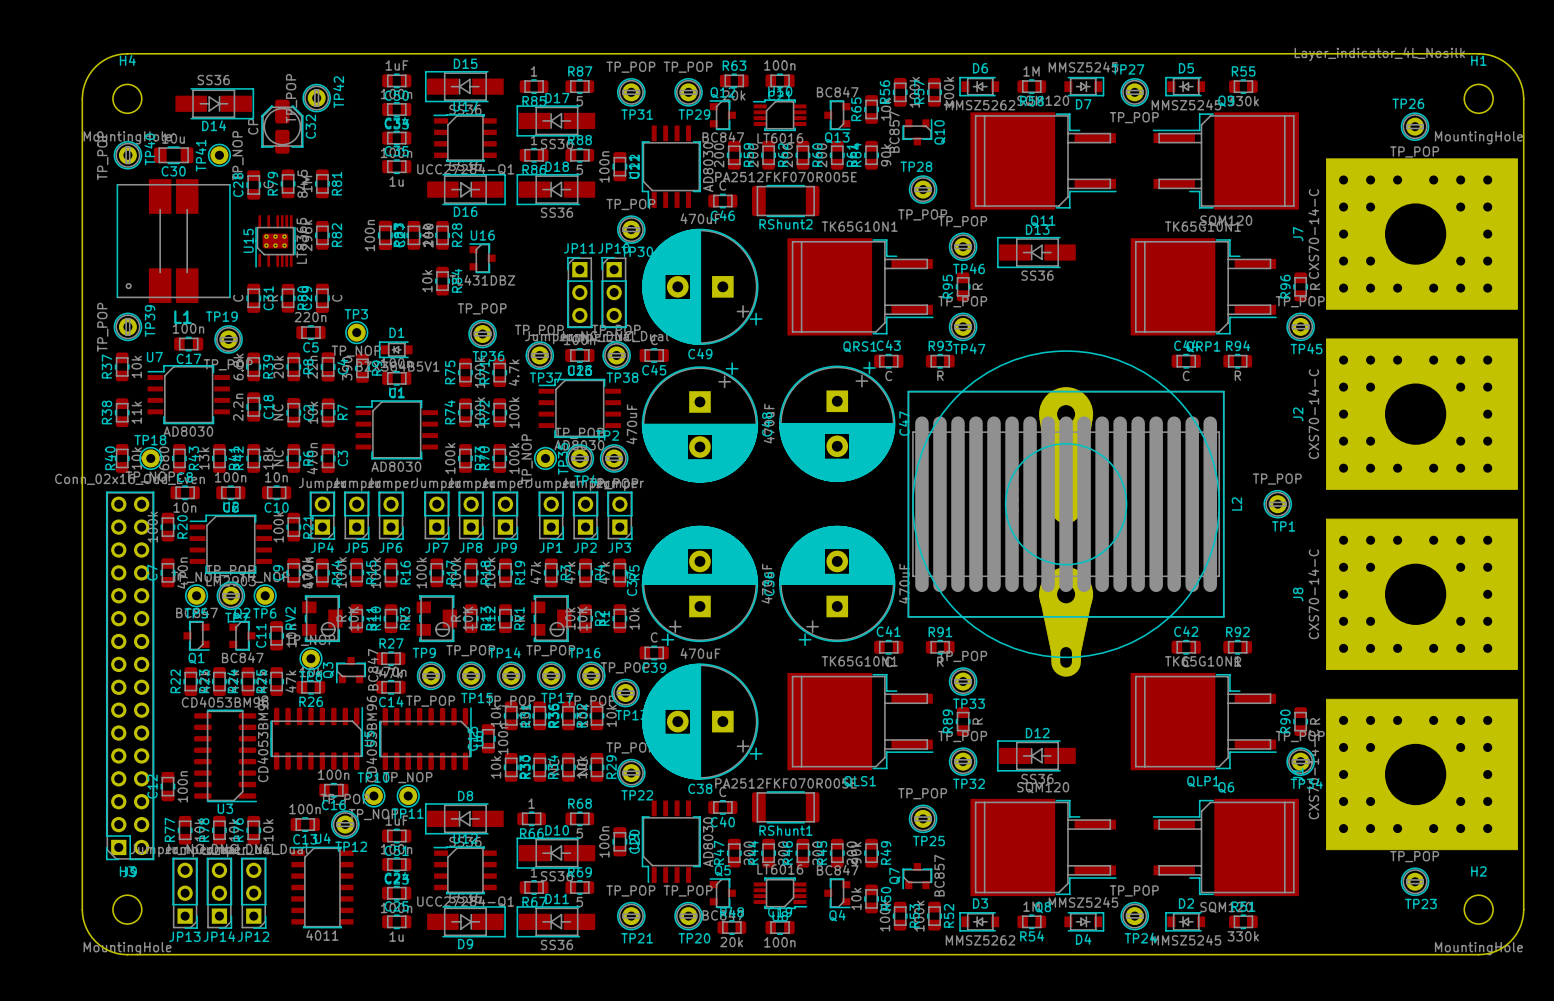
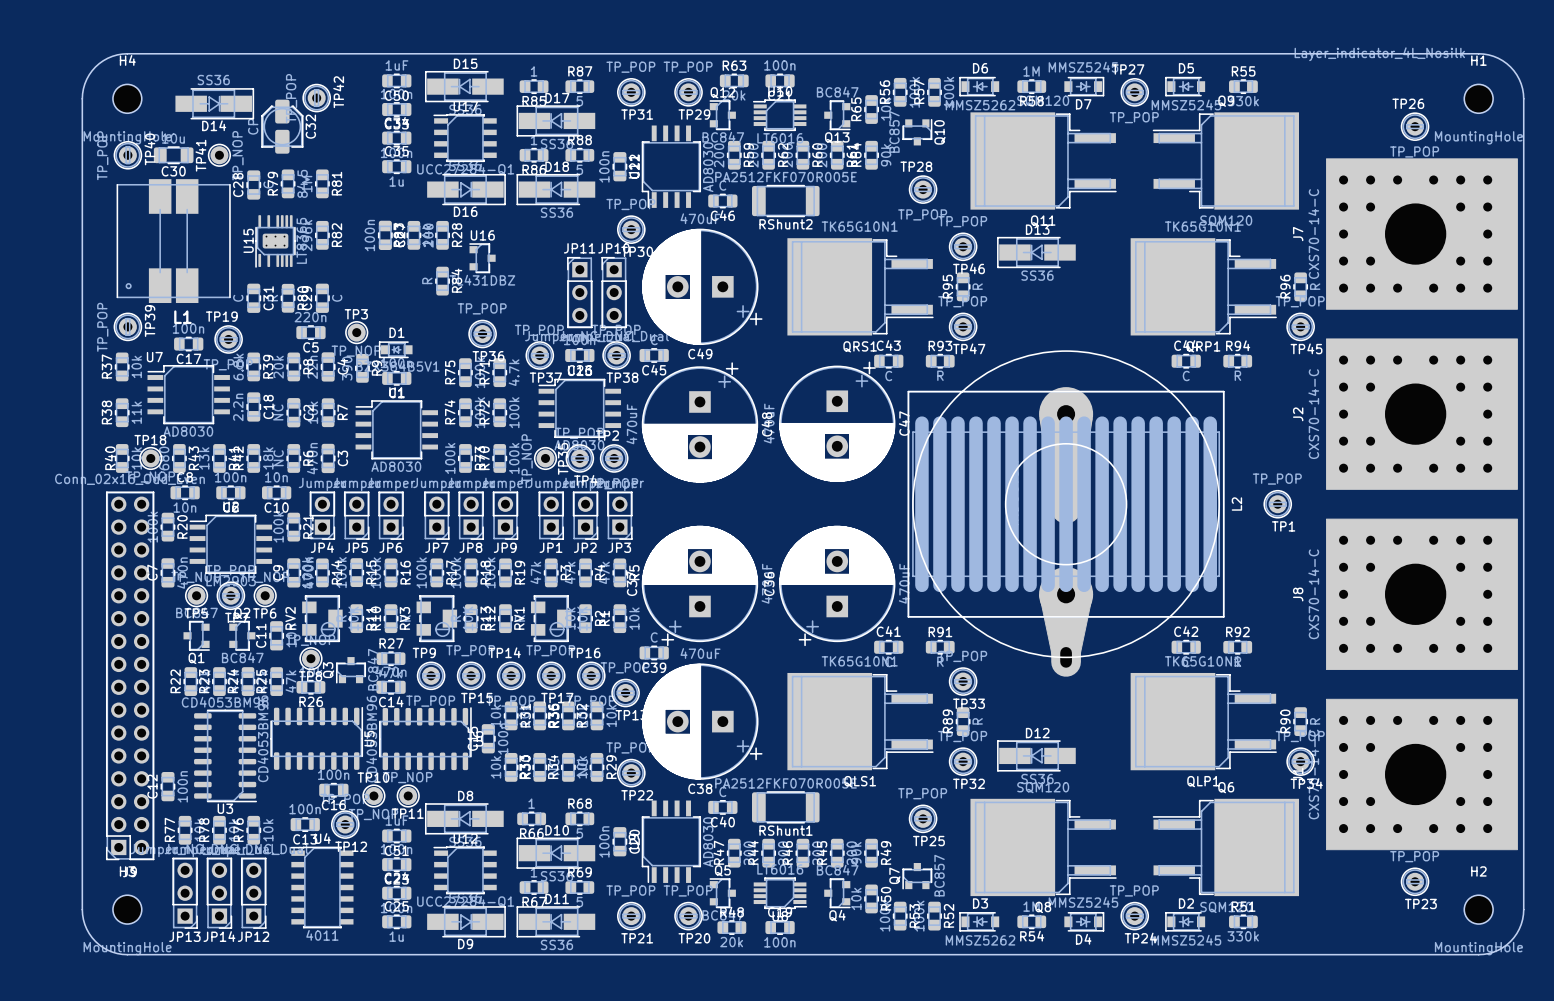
R84 value: 10k (427, 281) -> R (427, 280)

